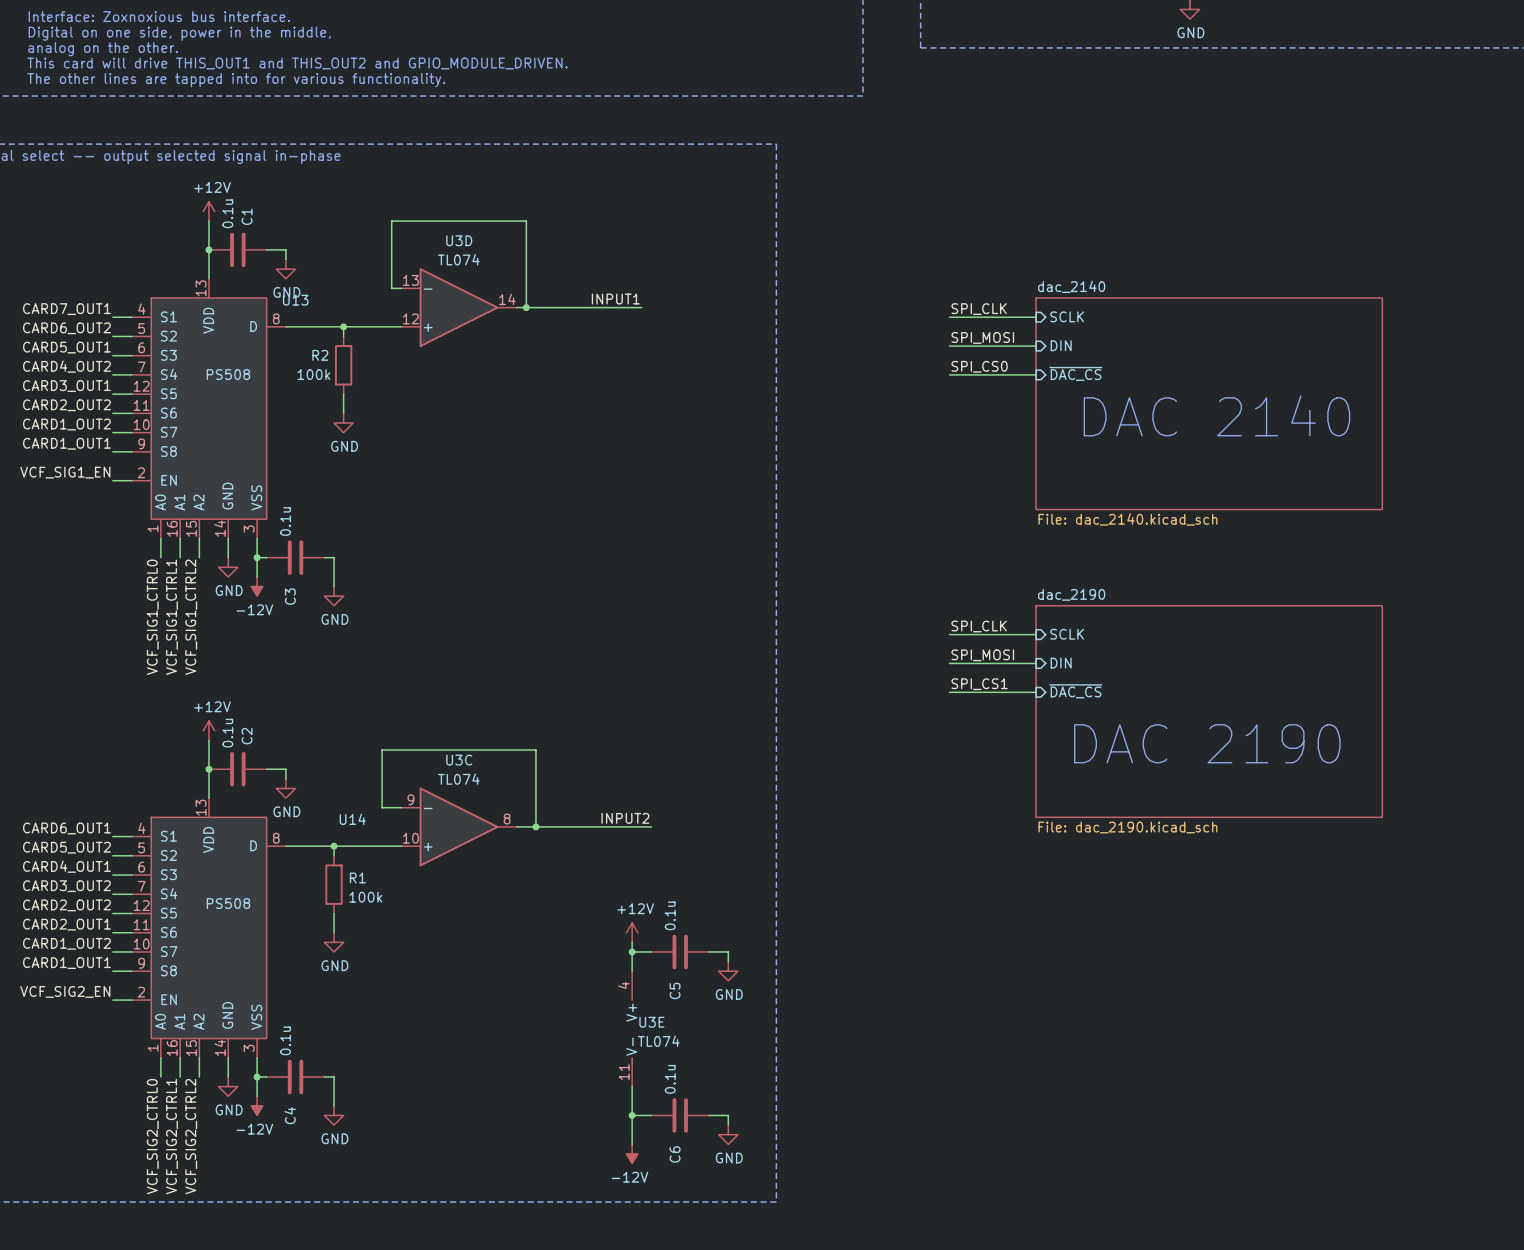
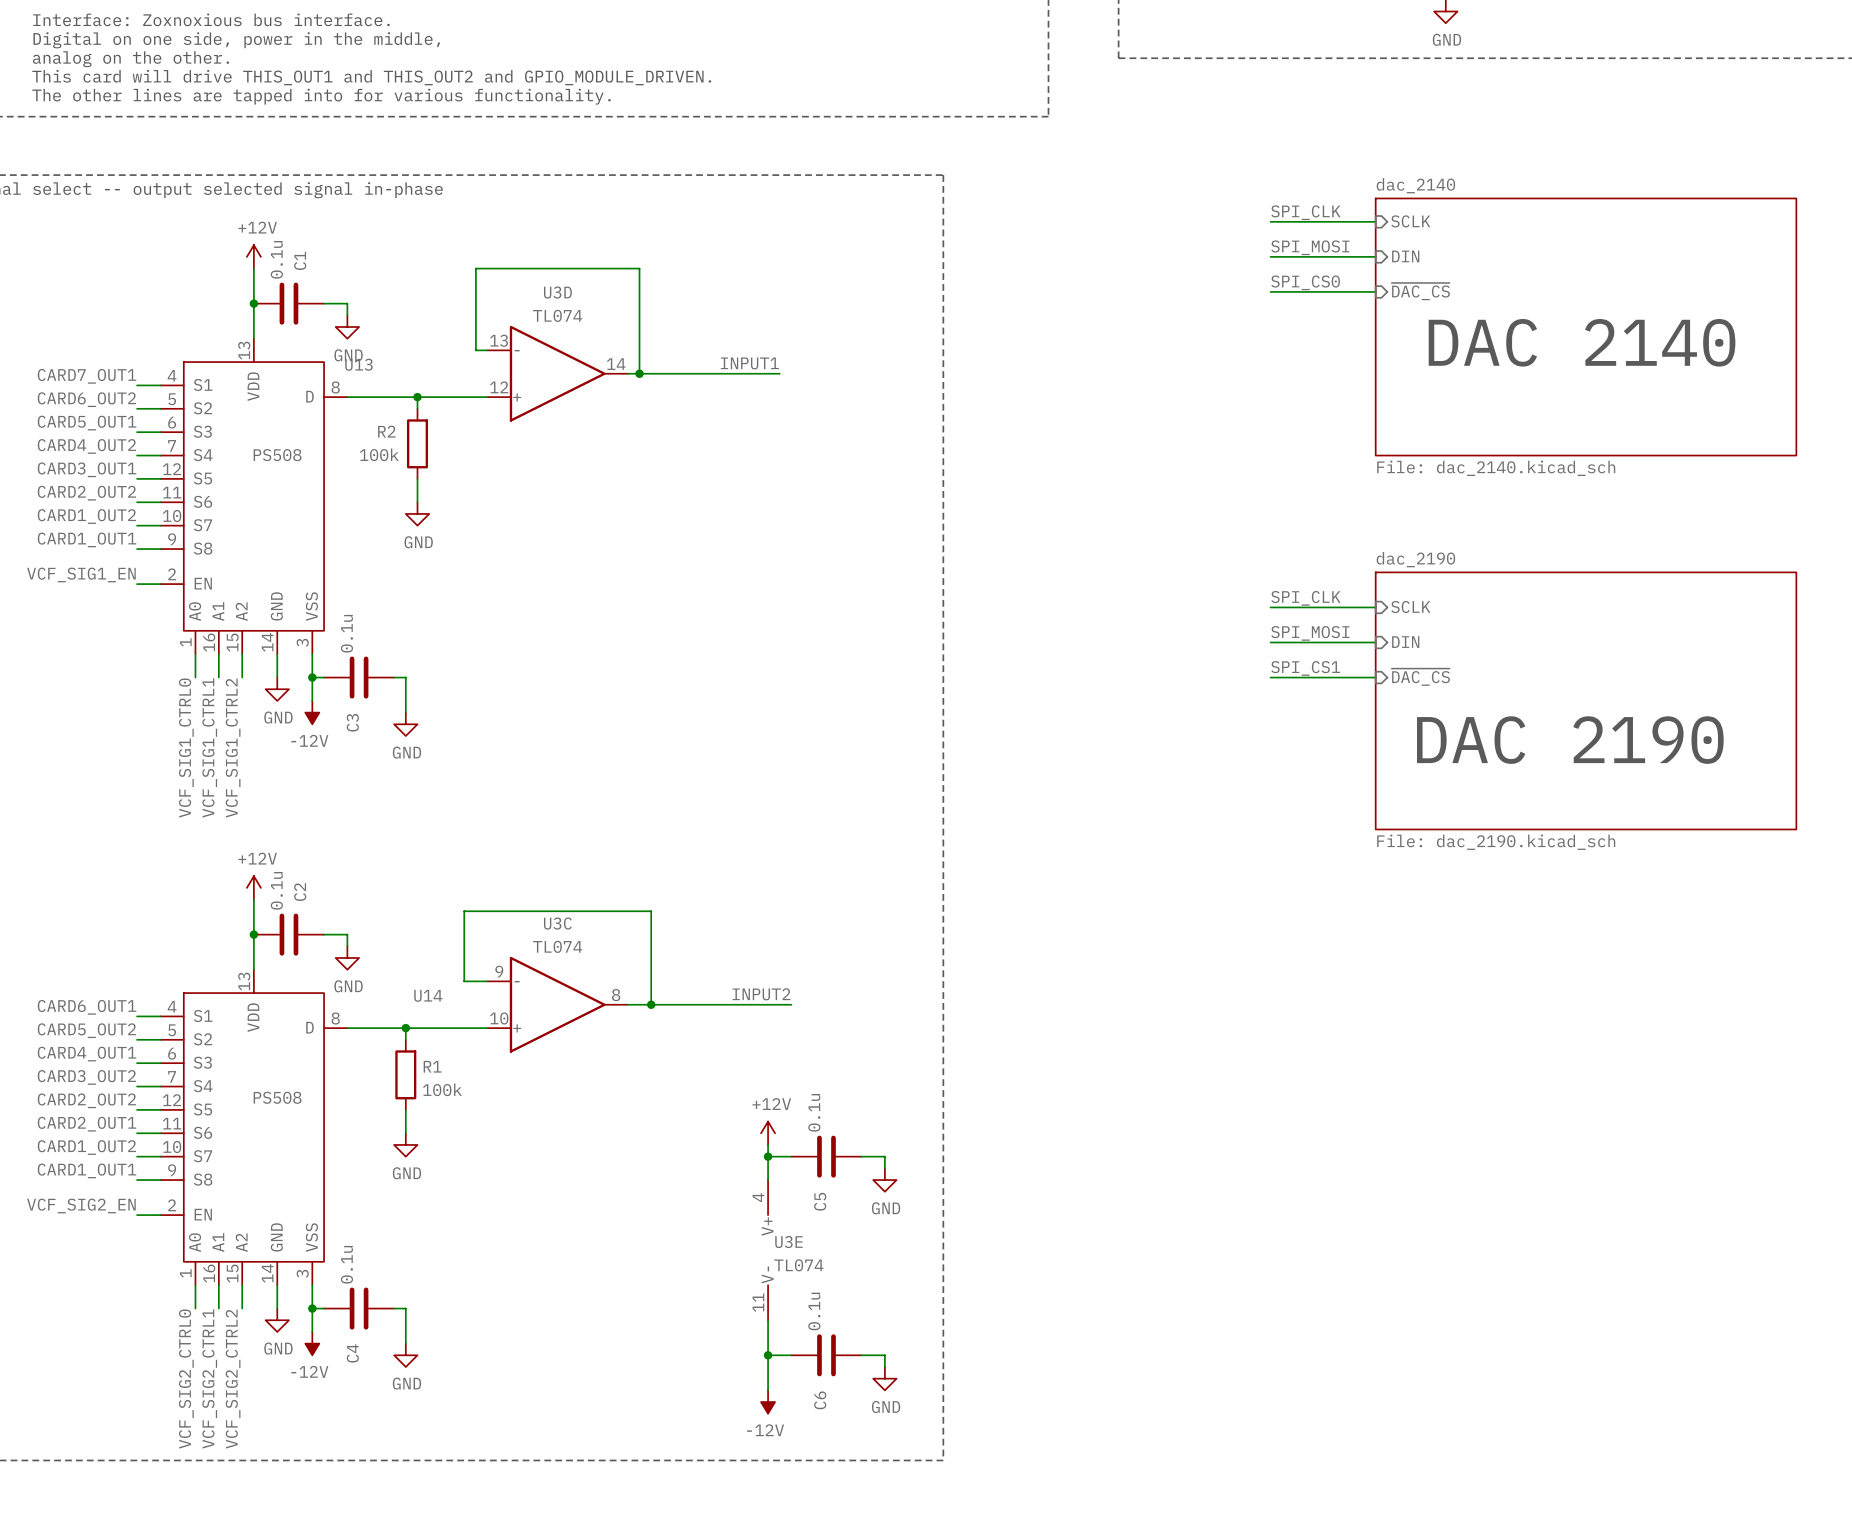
label: none -> SPI_CLK (1305, 212)
sheet pin: none -> SCLK (1410, 221)
label: none -> SPI_MOSI (1310, 247)
sheet pin: none -> DIN (1405, 256)
sheet pin: none -> ~{DAC_CS} (1420, 291)
label: SPI_CLK (979, 309) -> none
sheet pin: SCLK (1067, 316) -> none
wire: (949, 317) (1036, 317) -> (1270, 221) (1375, 221)
label: SPI_MOSI (982, 337) -> none
sheet pin: DIN (1061, 345) -> none
wire: (949, 346) (1036, 346) -> (1270, 256) (1375, 256)
label position: SPI_CS0 (979, 366) -> SPI_CS0 (1305, 282)
sheet pin: ~{DAC_CS} (1075, 373) -> none
wire: (949, 374) (1036, 374) -> (1270, 291) (1375, 291)
sheet dac_2140 position: (1209, 403) -> (1586, 327)
text position: DAC 2140 (1216, 415) -> DAC 2140 (1582, 342)
label: none -> SPI_CLK (1305, 598)
sheet pin: none -> SCLK (1410, 607)
label: none -> SPI_MOSI (1310, 633)
sheet pin: none -> DIN (1405, 642)
sheet pin: none -> ~{DAC_CS} (1420, 677)
label: SPI_CLK (979, 626) -> none
wire: (949, 634) (1036, 634) -> (1270, 607) (1375, 607)
sheet pin: SCLK (1067, 634) -> none
label: SPI_MOSI (982, 655) -> none
wire: (949, 663) (1036, 663) -> (1270, 642) (1375, 642)
sheet pin: DIN (1061, 663) -> none
label position: SPI_CS1 (979, 684) -> SPI_CS1 (1305, 668)
sheet pin: ~{DAC_CS} (1075, 691) -> none
wire: (949, 692) (1036, 692) -> (1270, 677) (1375, 677)
sheet dac_2190 position: (1209, 711) -> (1586, 700)
text position: DAC 2190 (1207, 743) -> DAC 2190 (1570, 740)

